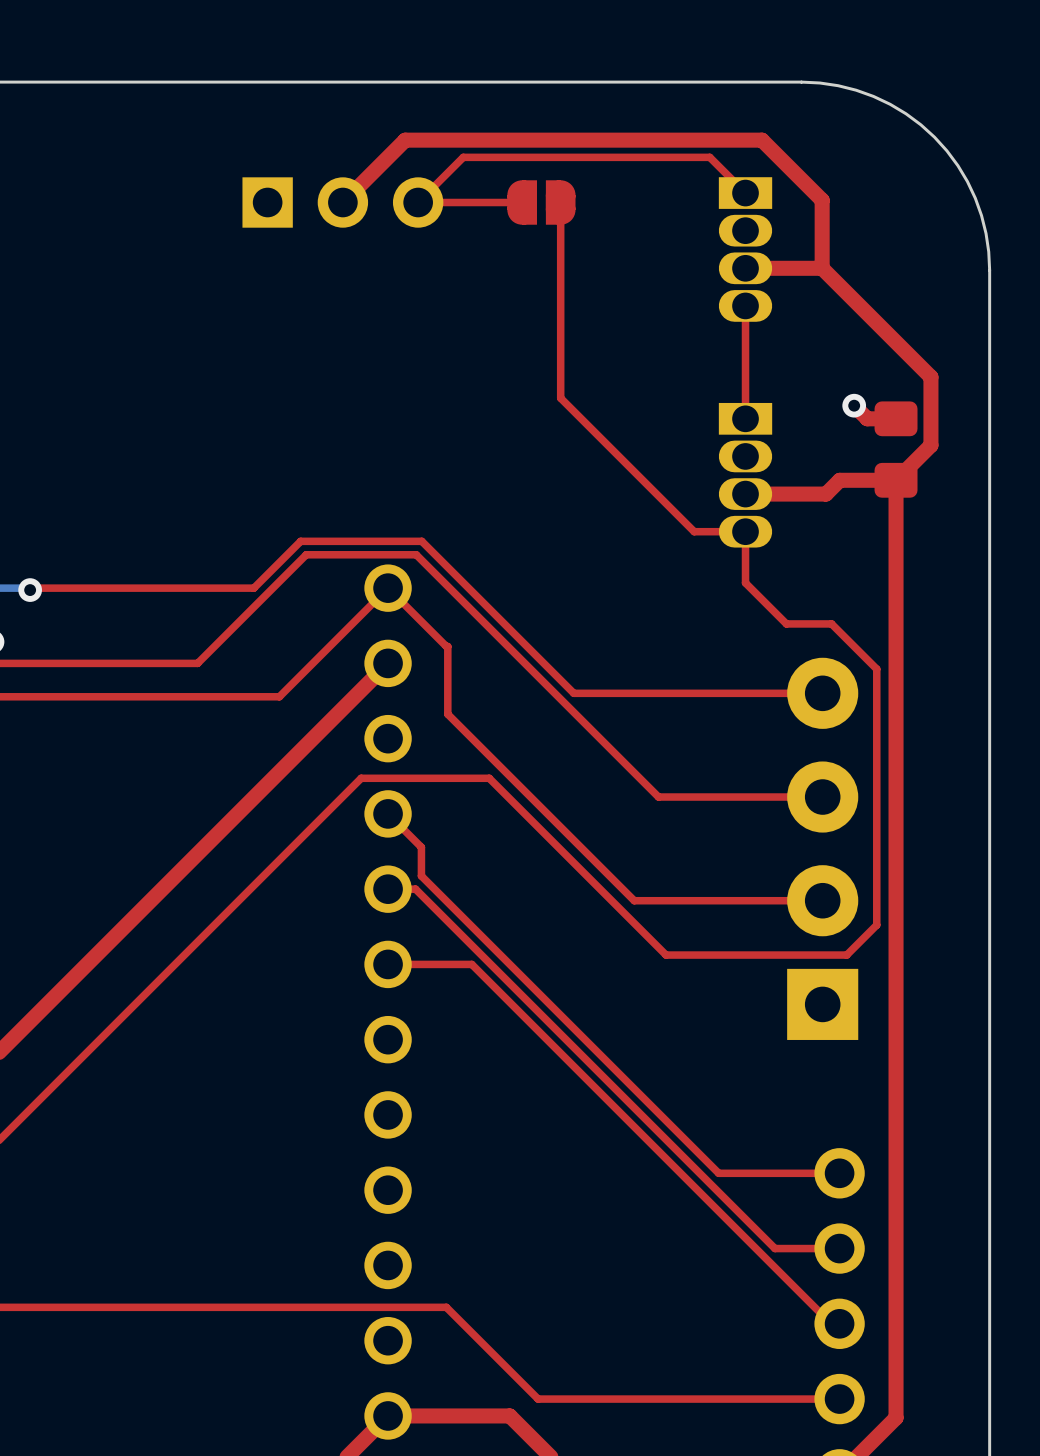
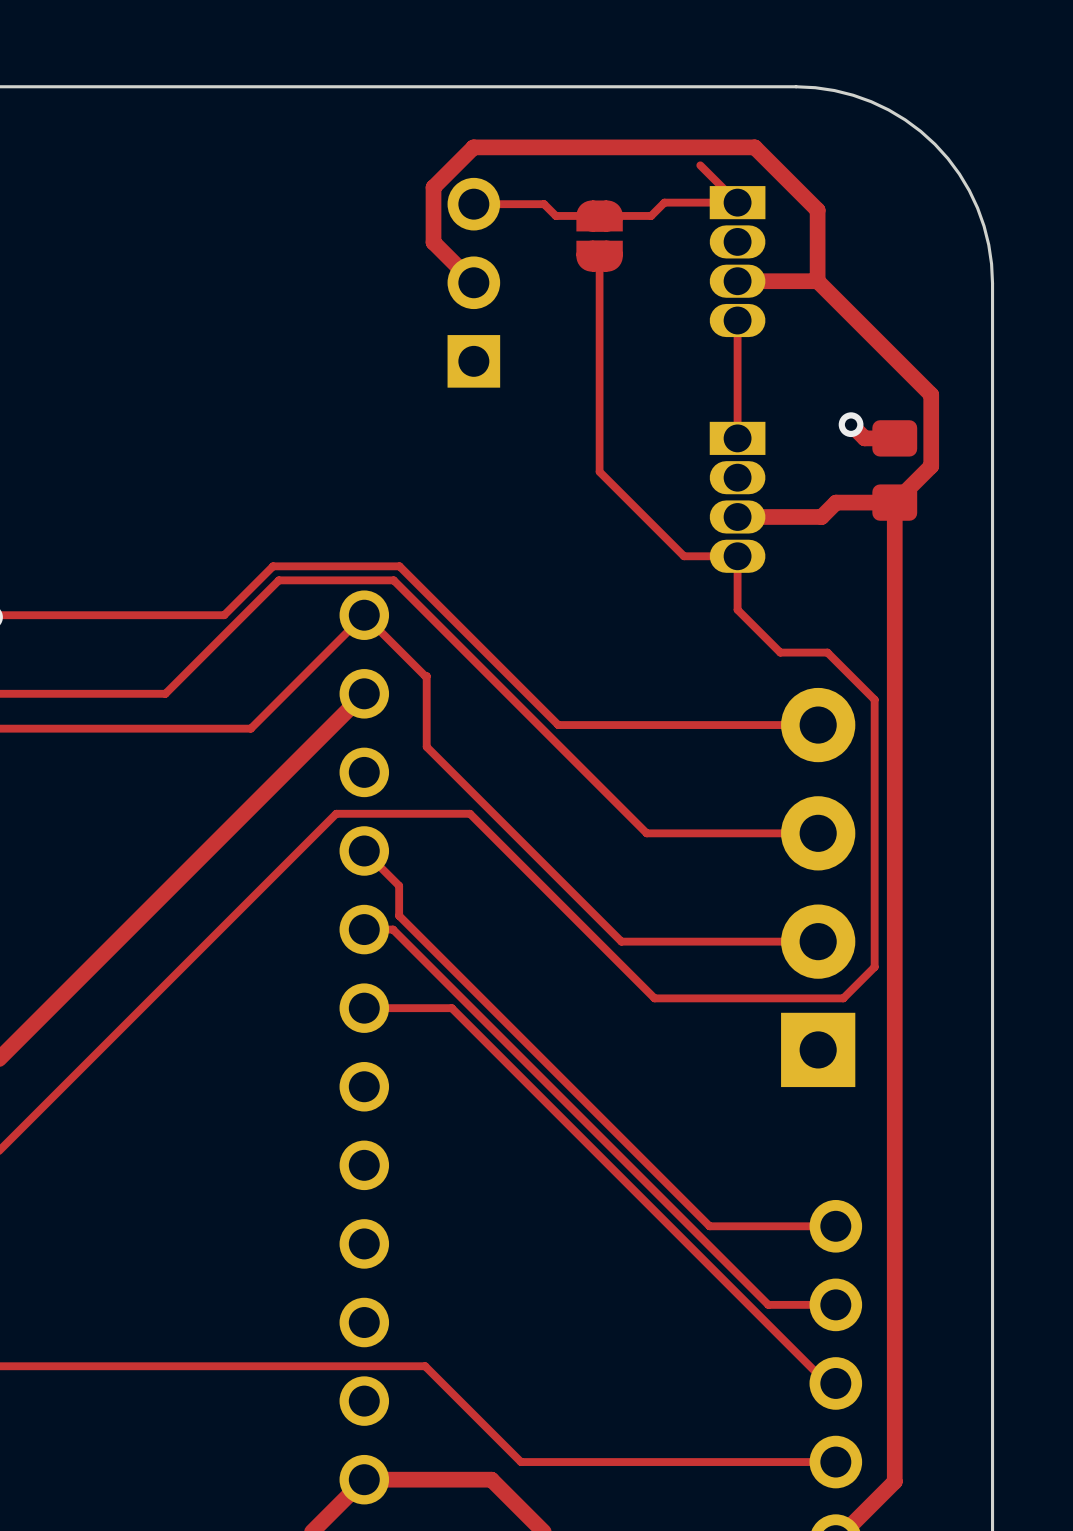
top track: (492, 140) (405, 140) (342, 202) -> (473, 147) (433, 187) (433, 242) (473, 282)
top track: (709, 157) (463, 157) (418, 202) (522, 202) -> none
top track: none -> (737, 202) (664, 202) (651, 215) (555, 215) (544, 204) (473, 204)
part rotation: 0° (342, 202) -> 90° counterclockwise (473, 282)
part position: (342, 202) -> (473, 282)
part rotation: 0° (541, 202) -> 90° clockwise (599, 236)
part position: (541, 202) -> (599, 236)
top track: (560, 202) (560, 398) (613, 450) -> (599, 256) (599, 471)

